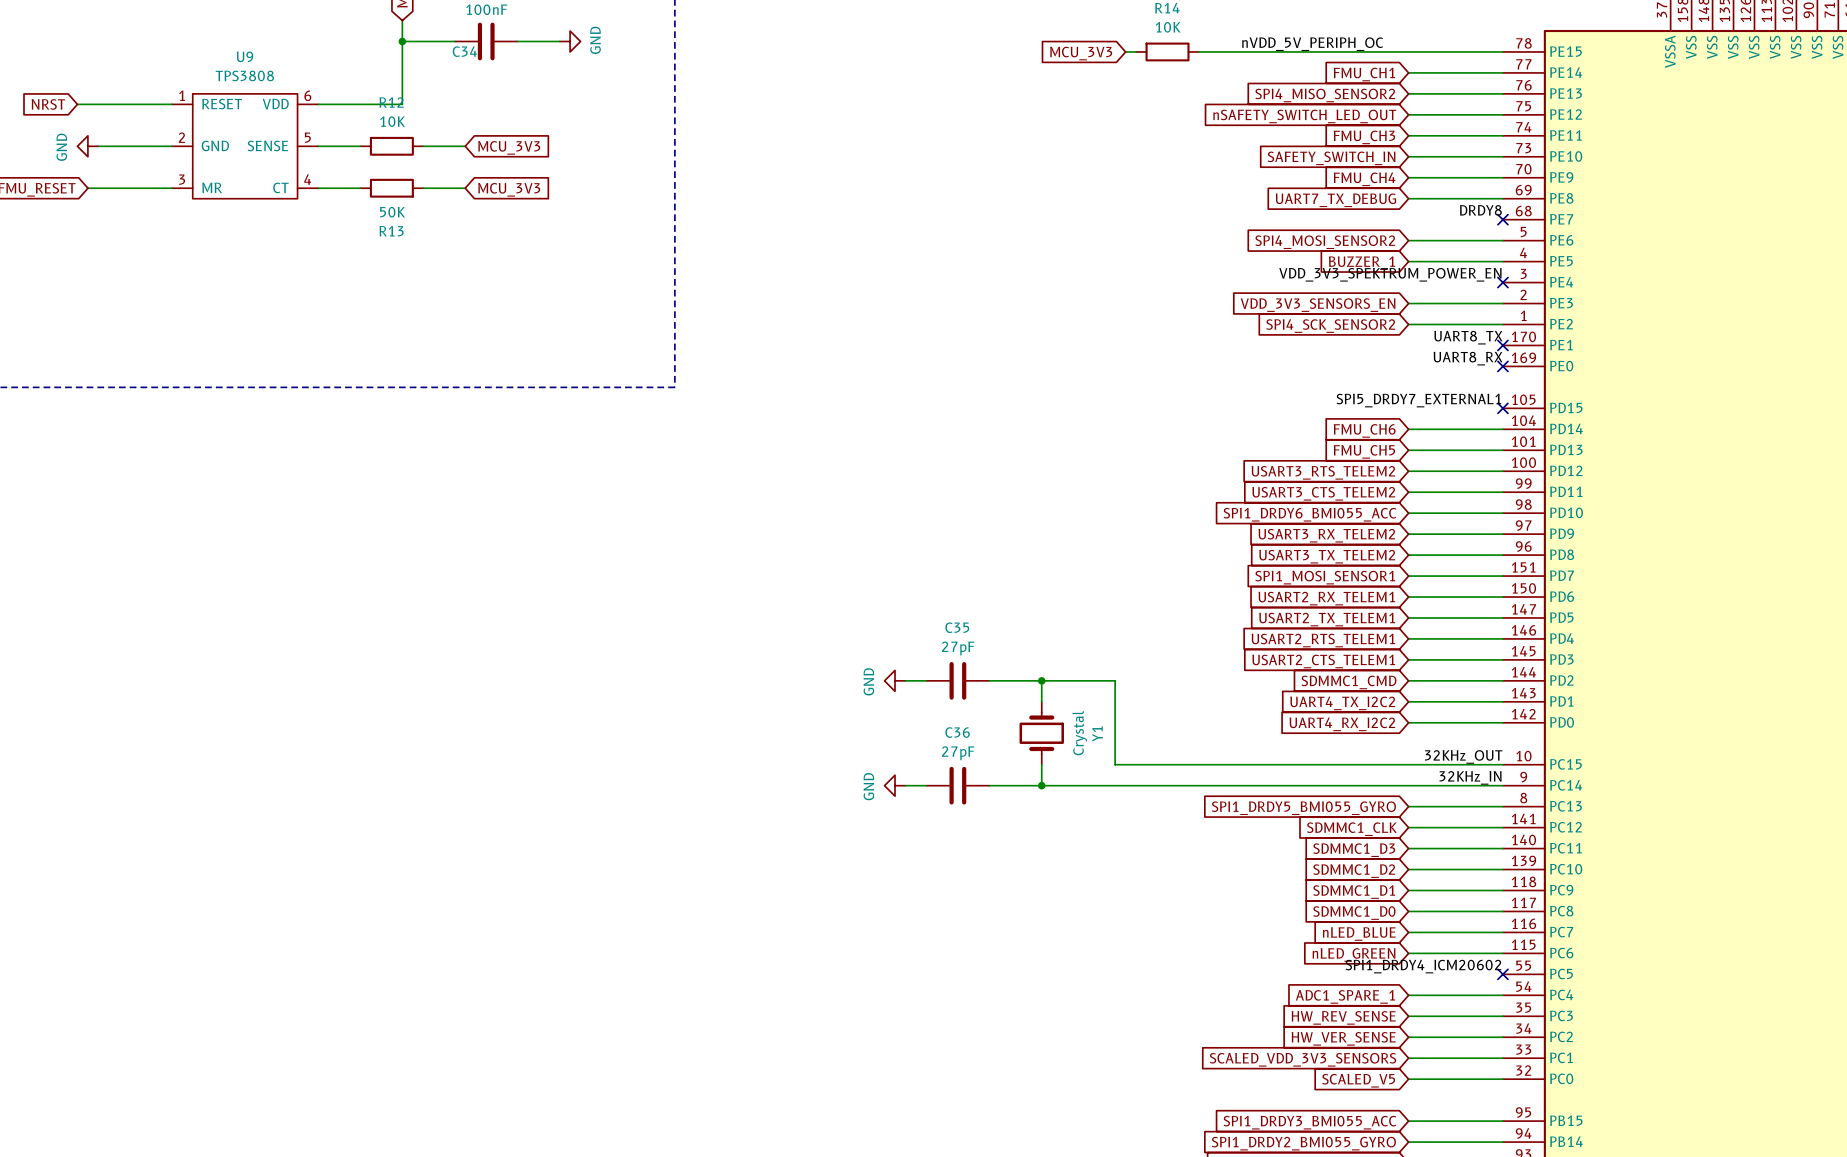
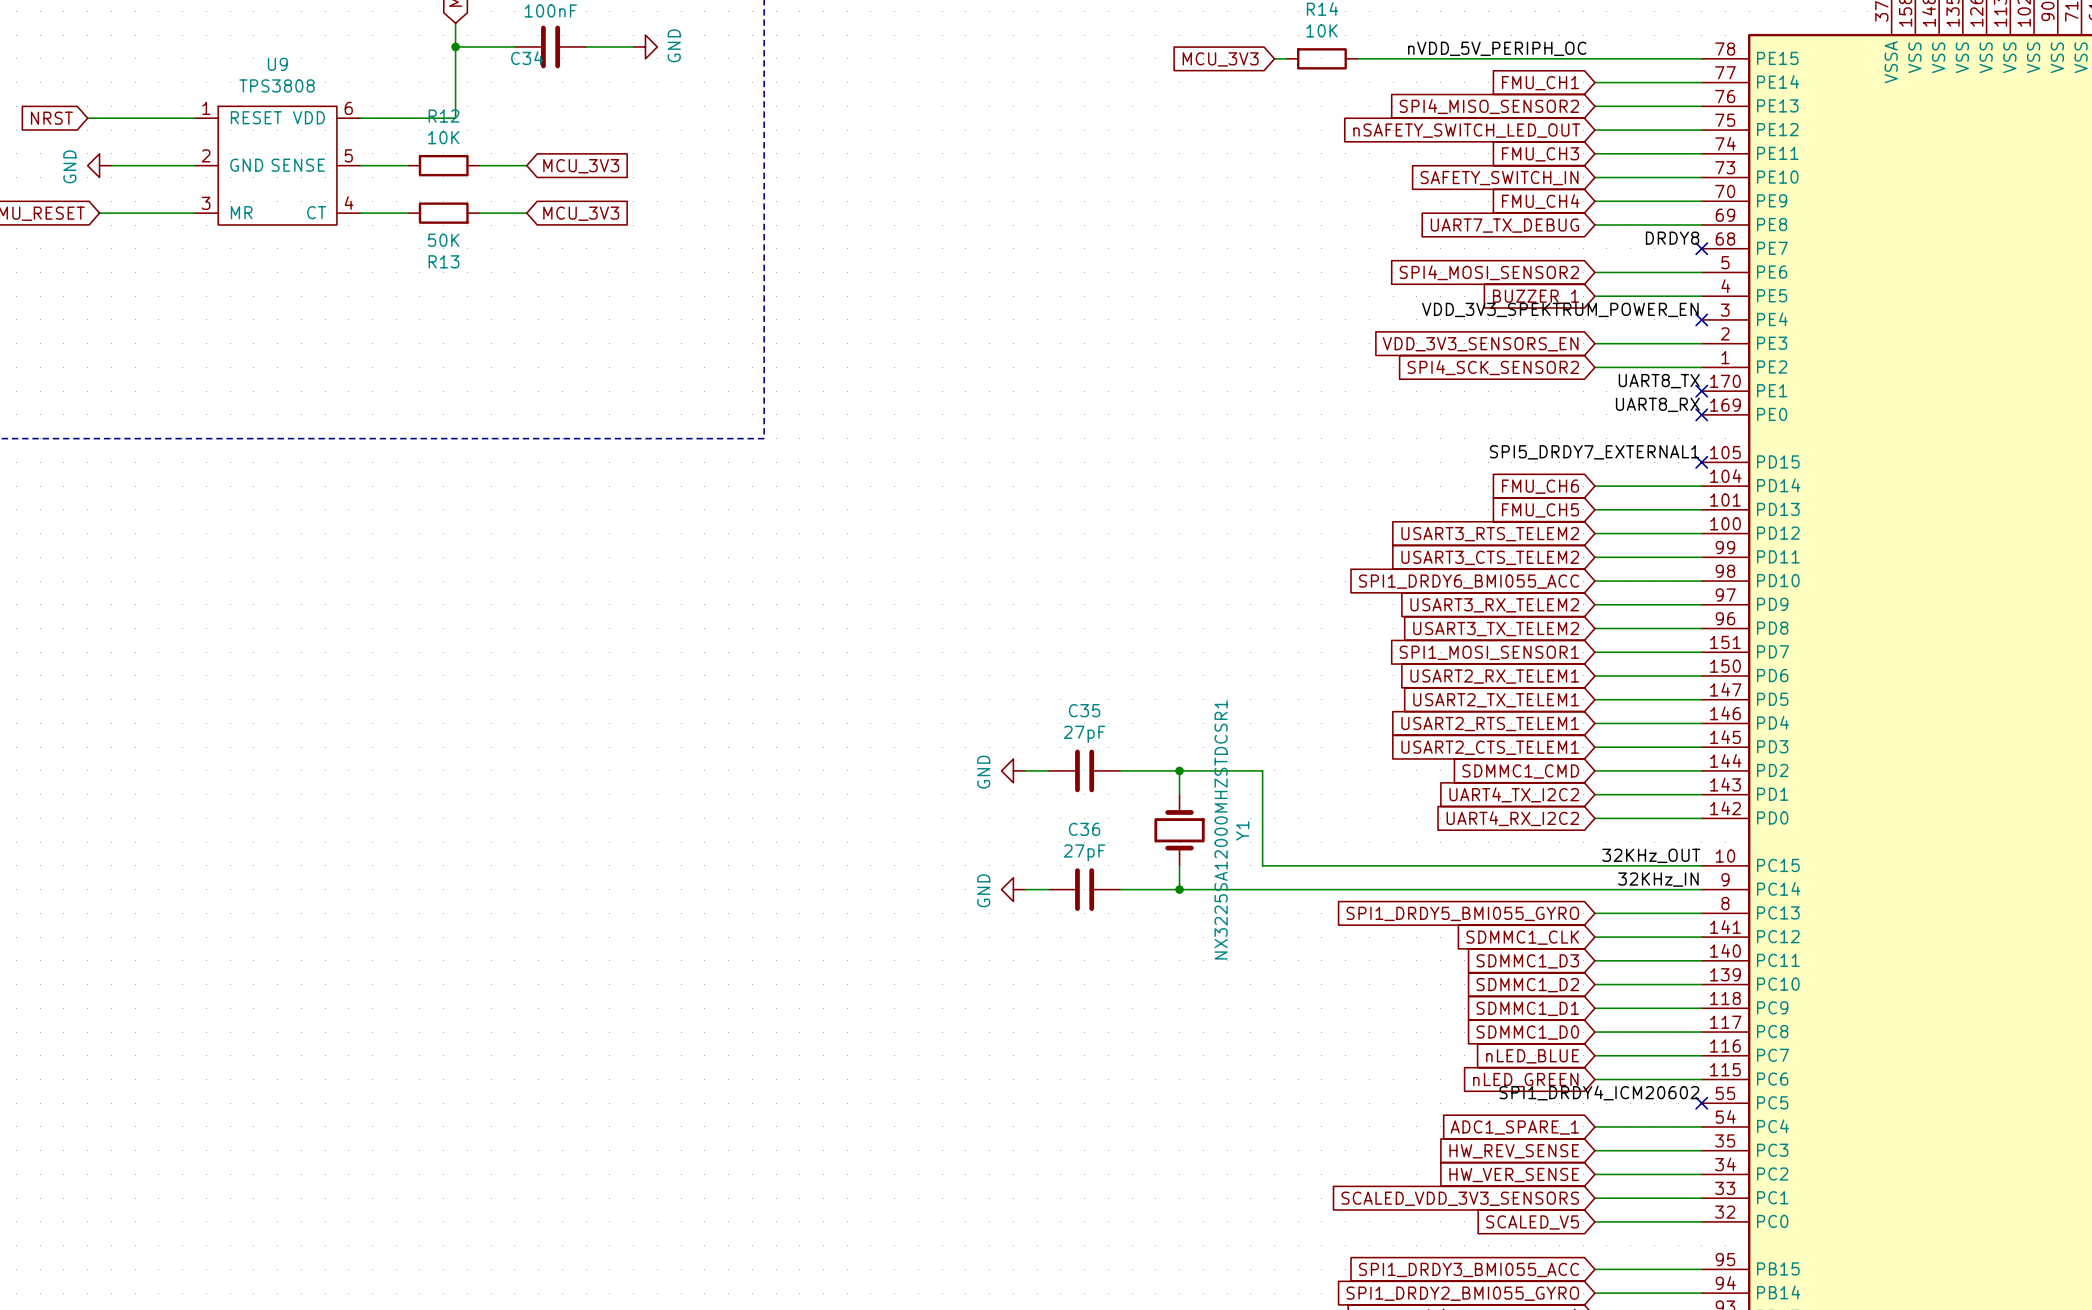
Y1 value: Crystal (1079, 733) -> NX3225SA12000MHZSTDCSR1 (1221, 829)

